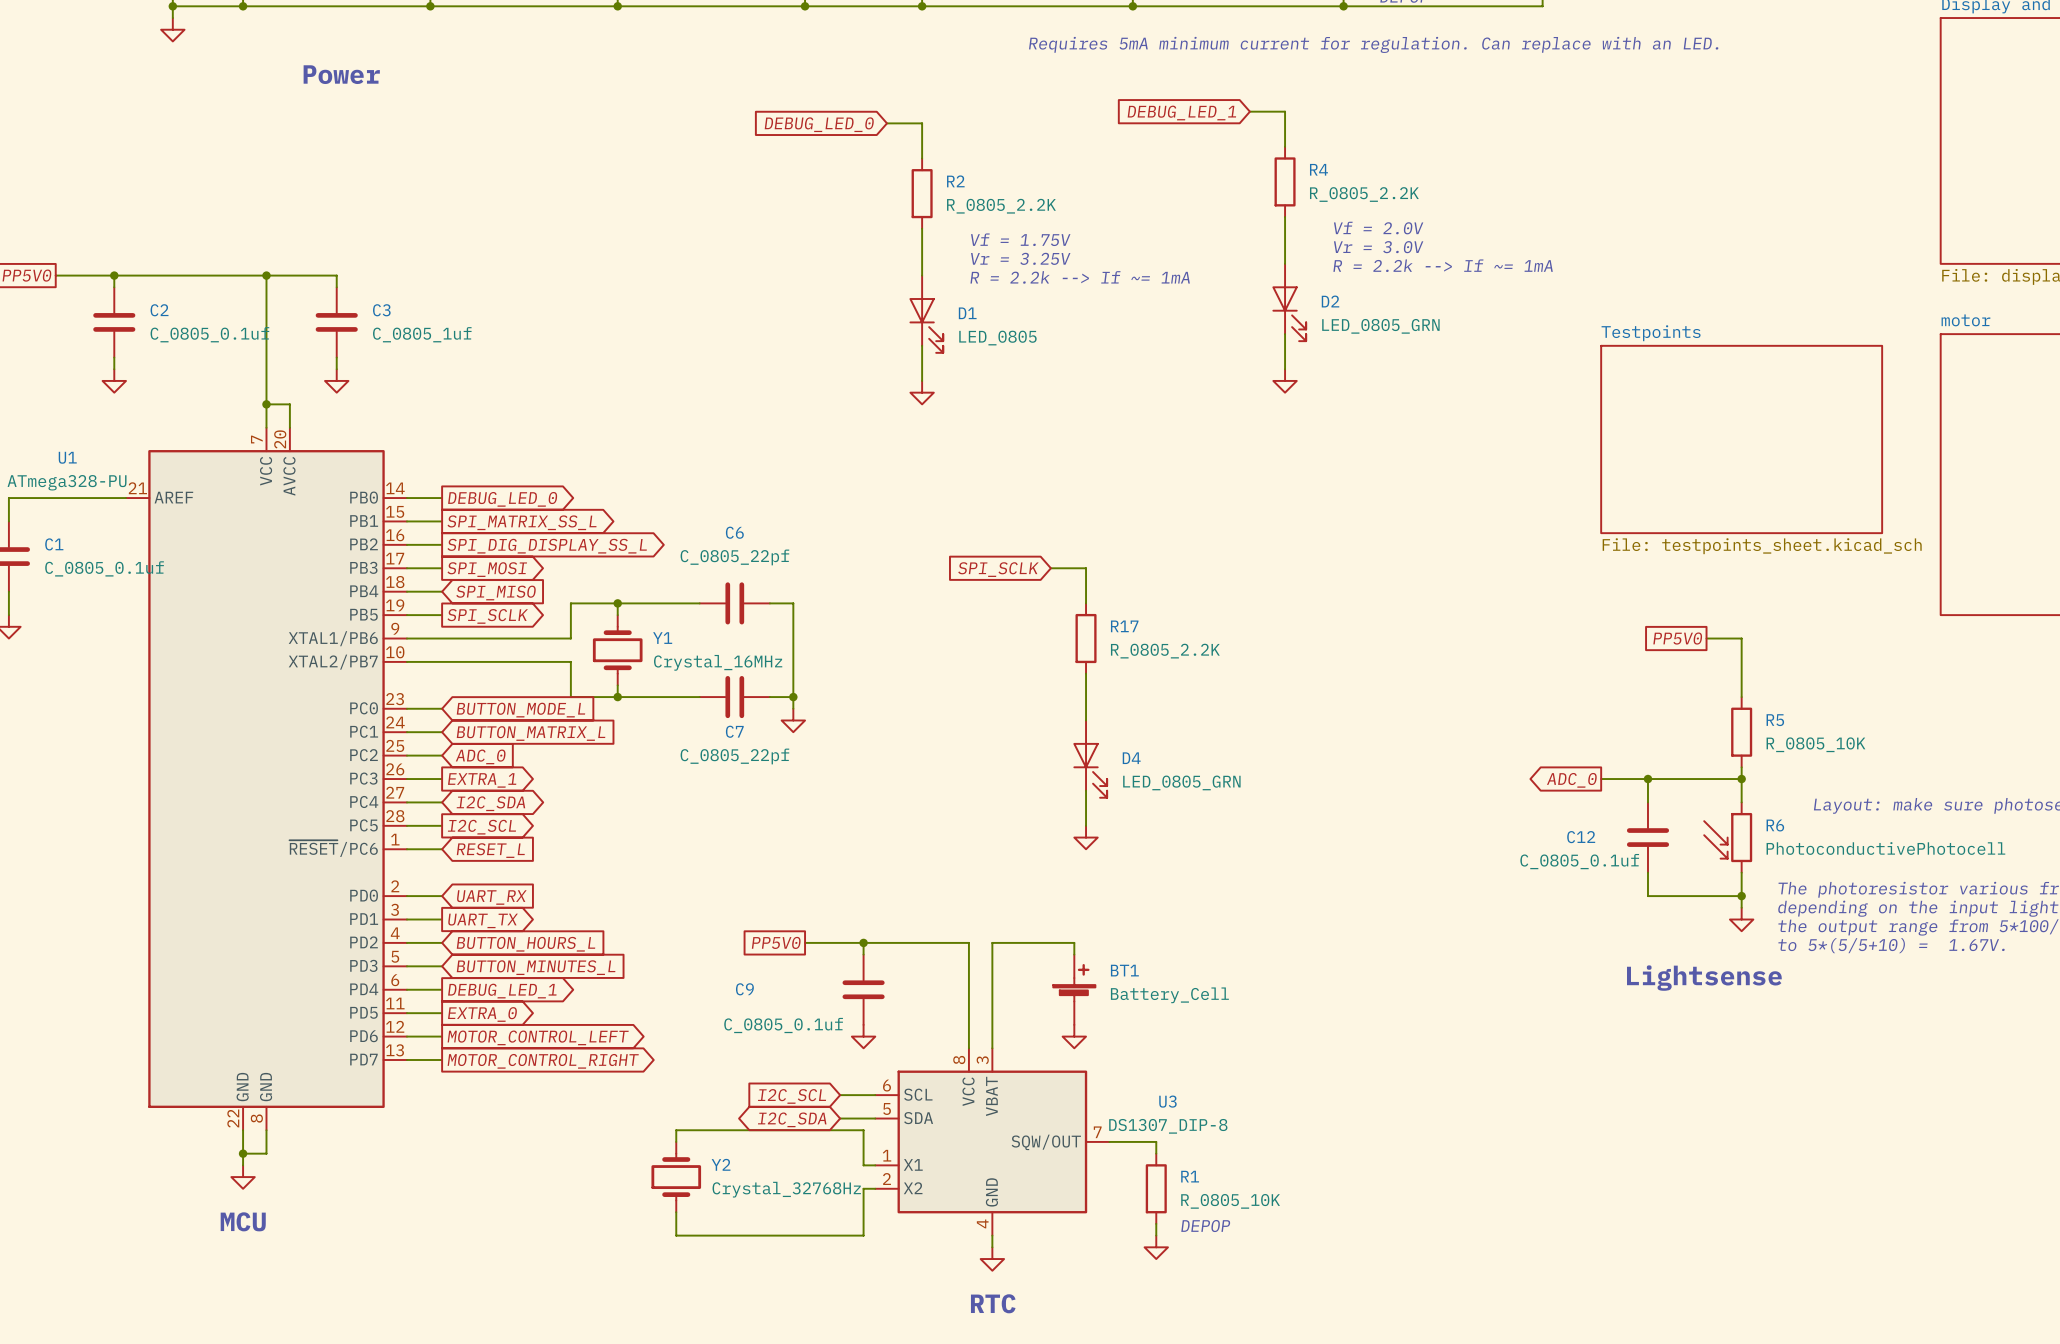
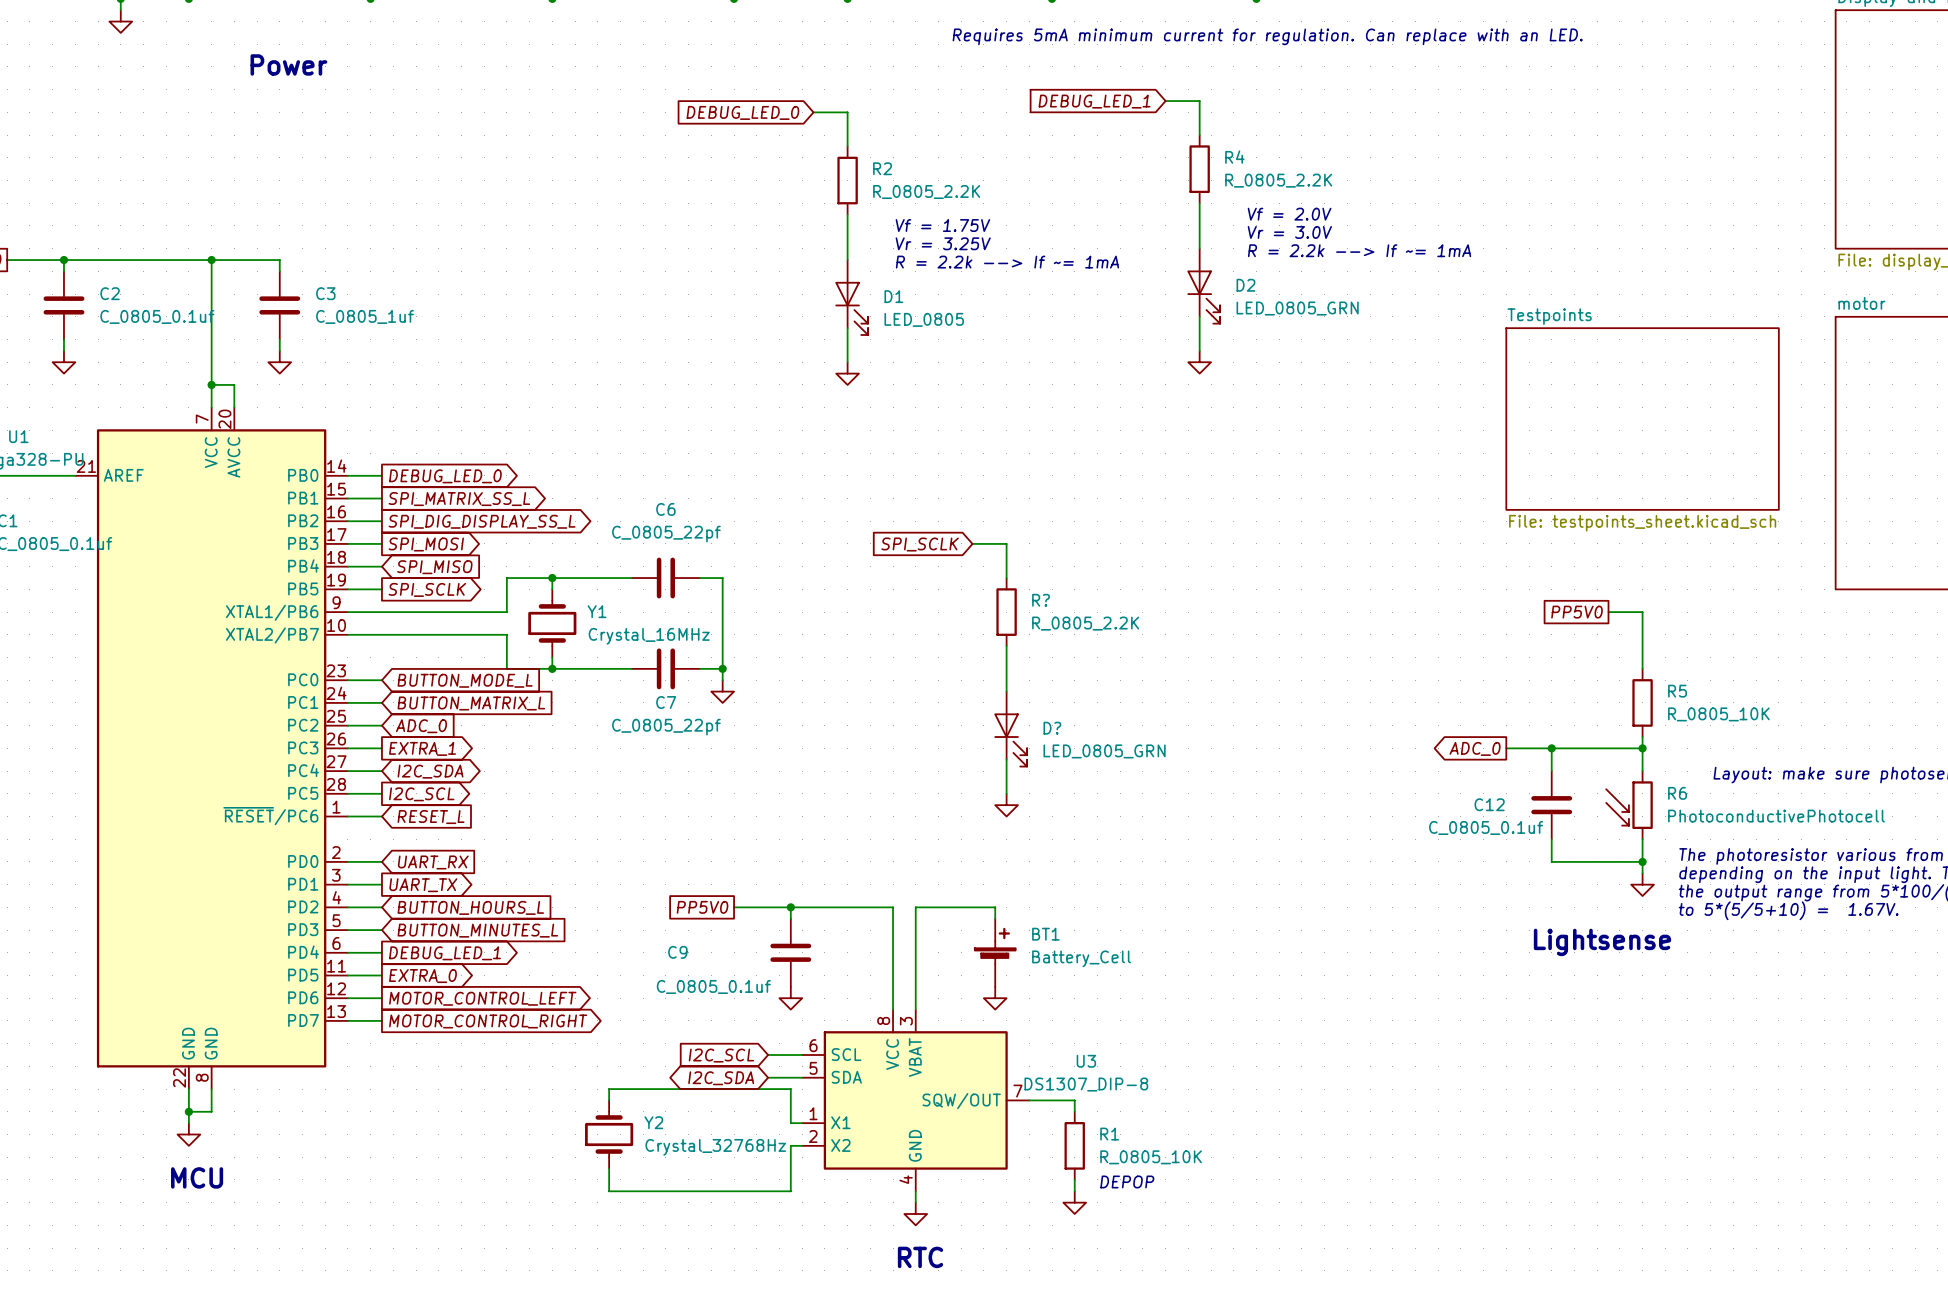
R17 name: R17 (1124, 626) -> R? (1041, 600)
D4 name: D4 (1131, 758) -> D? (1052, 728)

